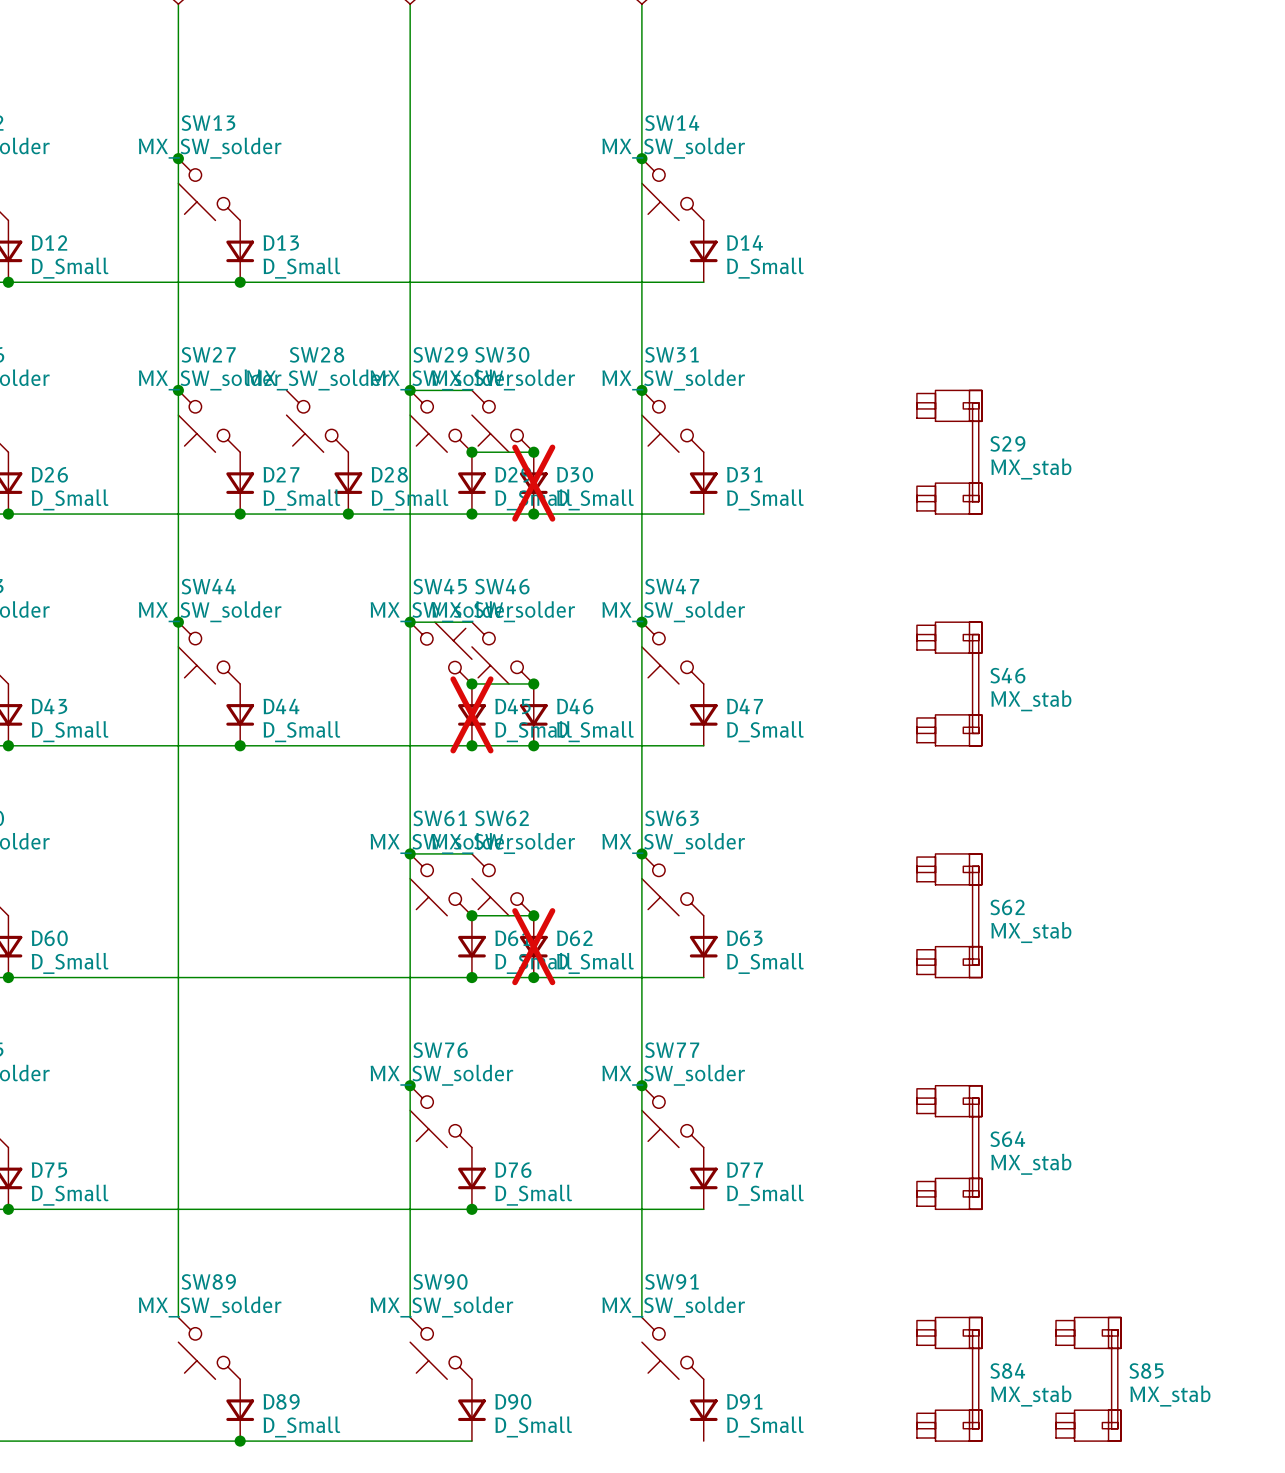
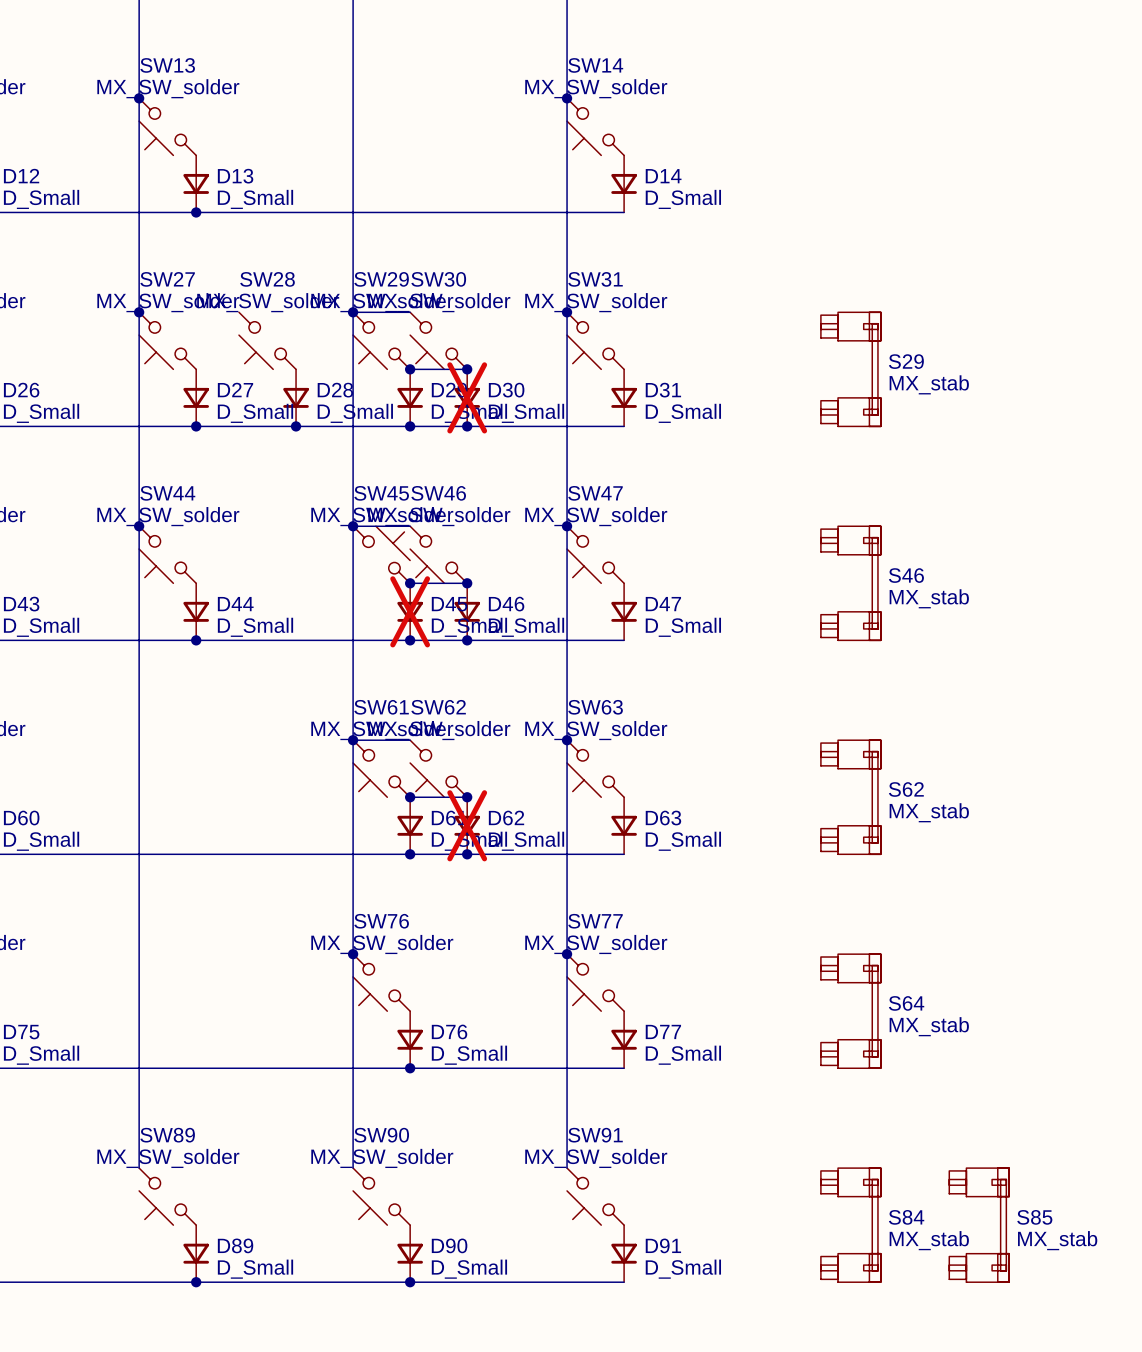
wire: none -> (410, 1282) (624, 1282)
junction: none -> (410, 1282)

